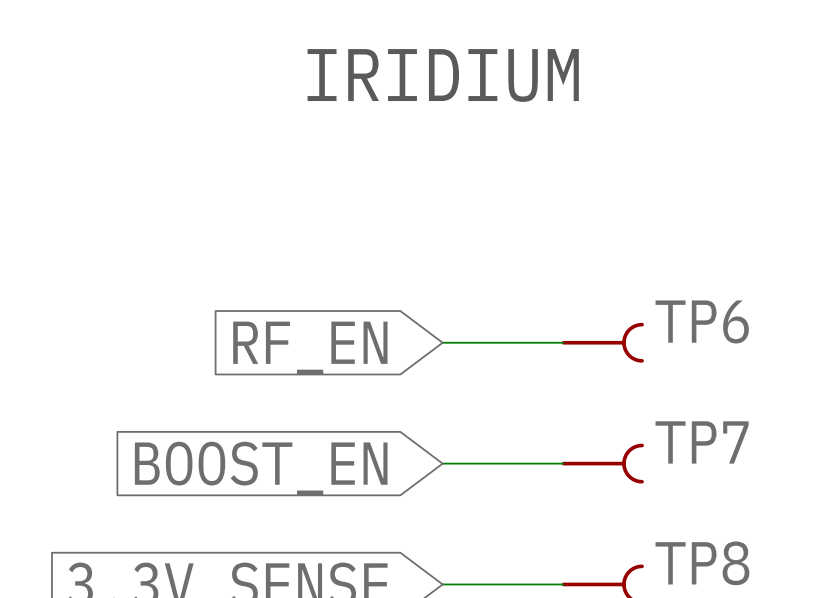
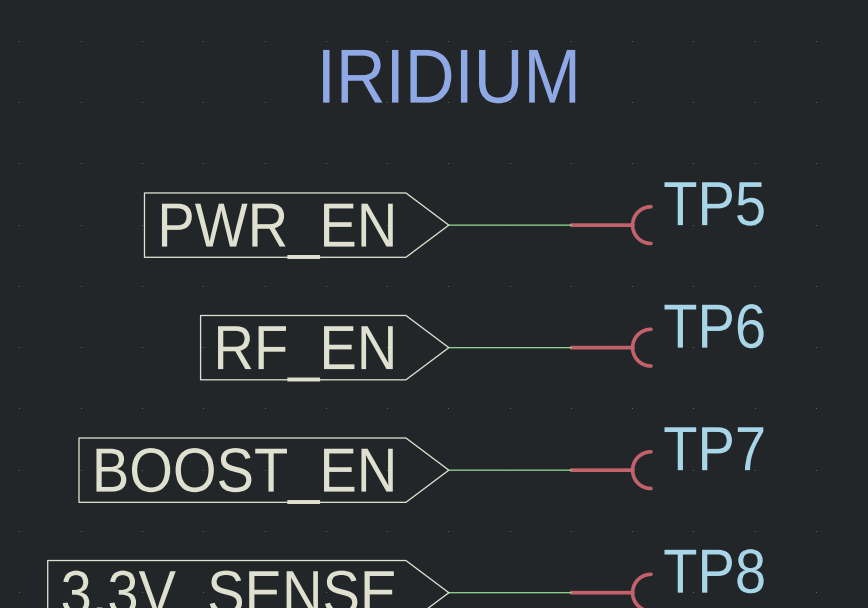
wire: none -> (448, 225) (571, 225)
TP5: none -> (611, 225)
global label: none -> PWR_EN (277, 231)

